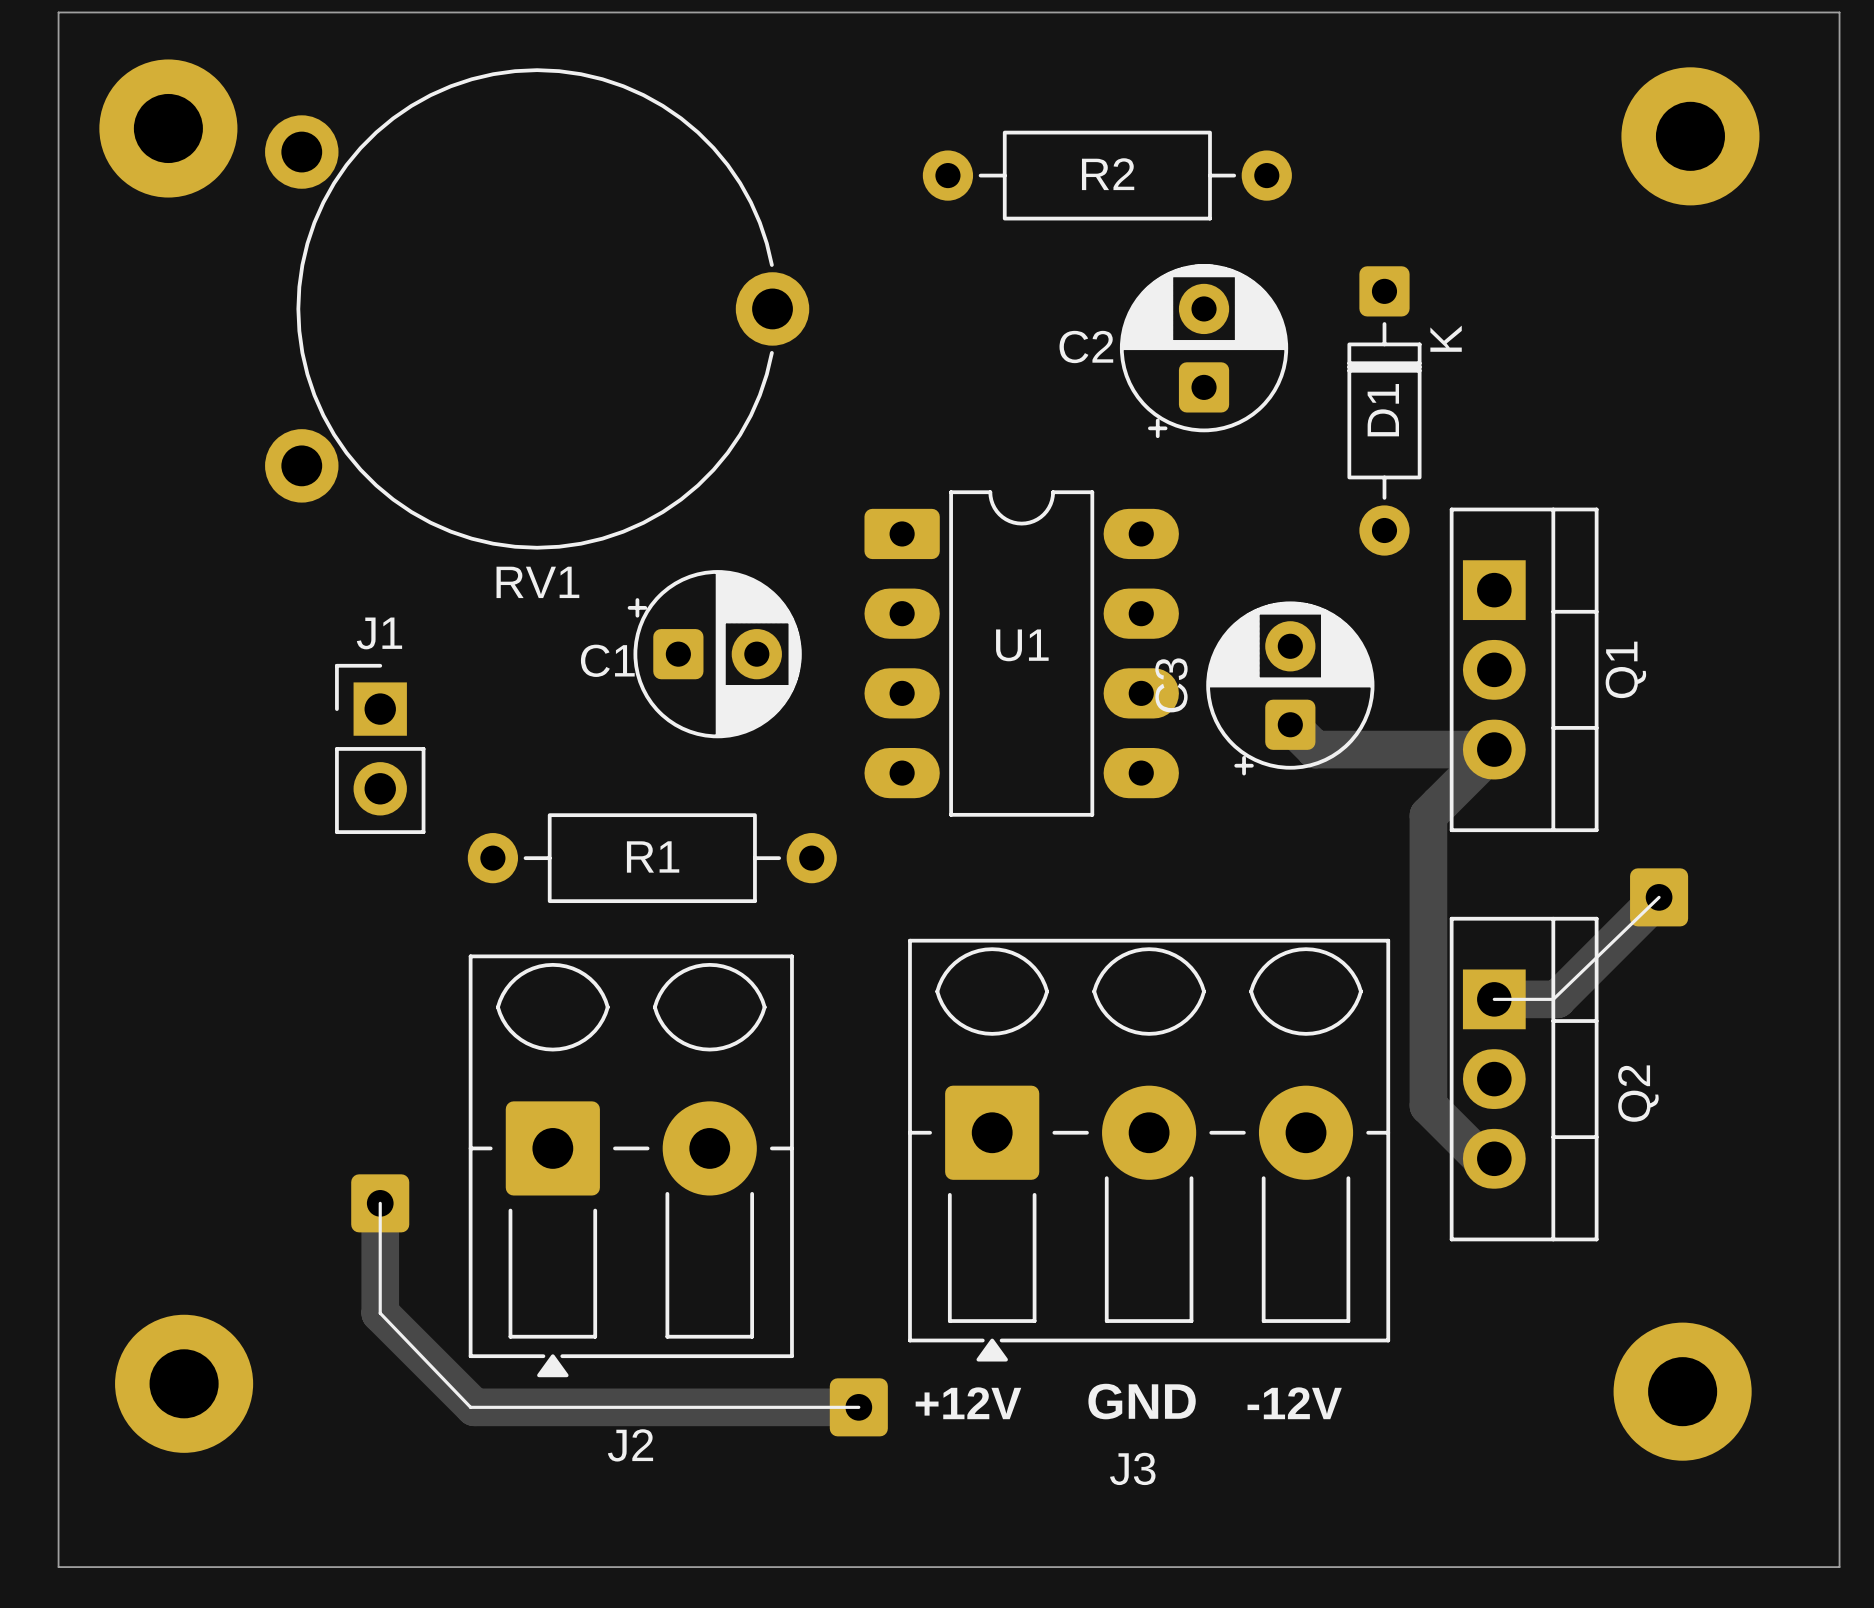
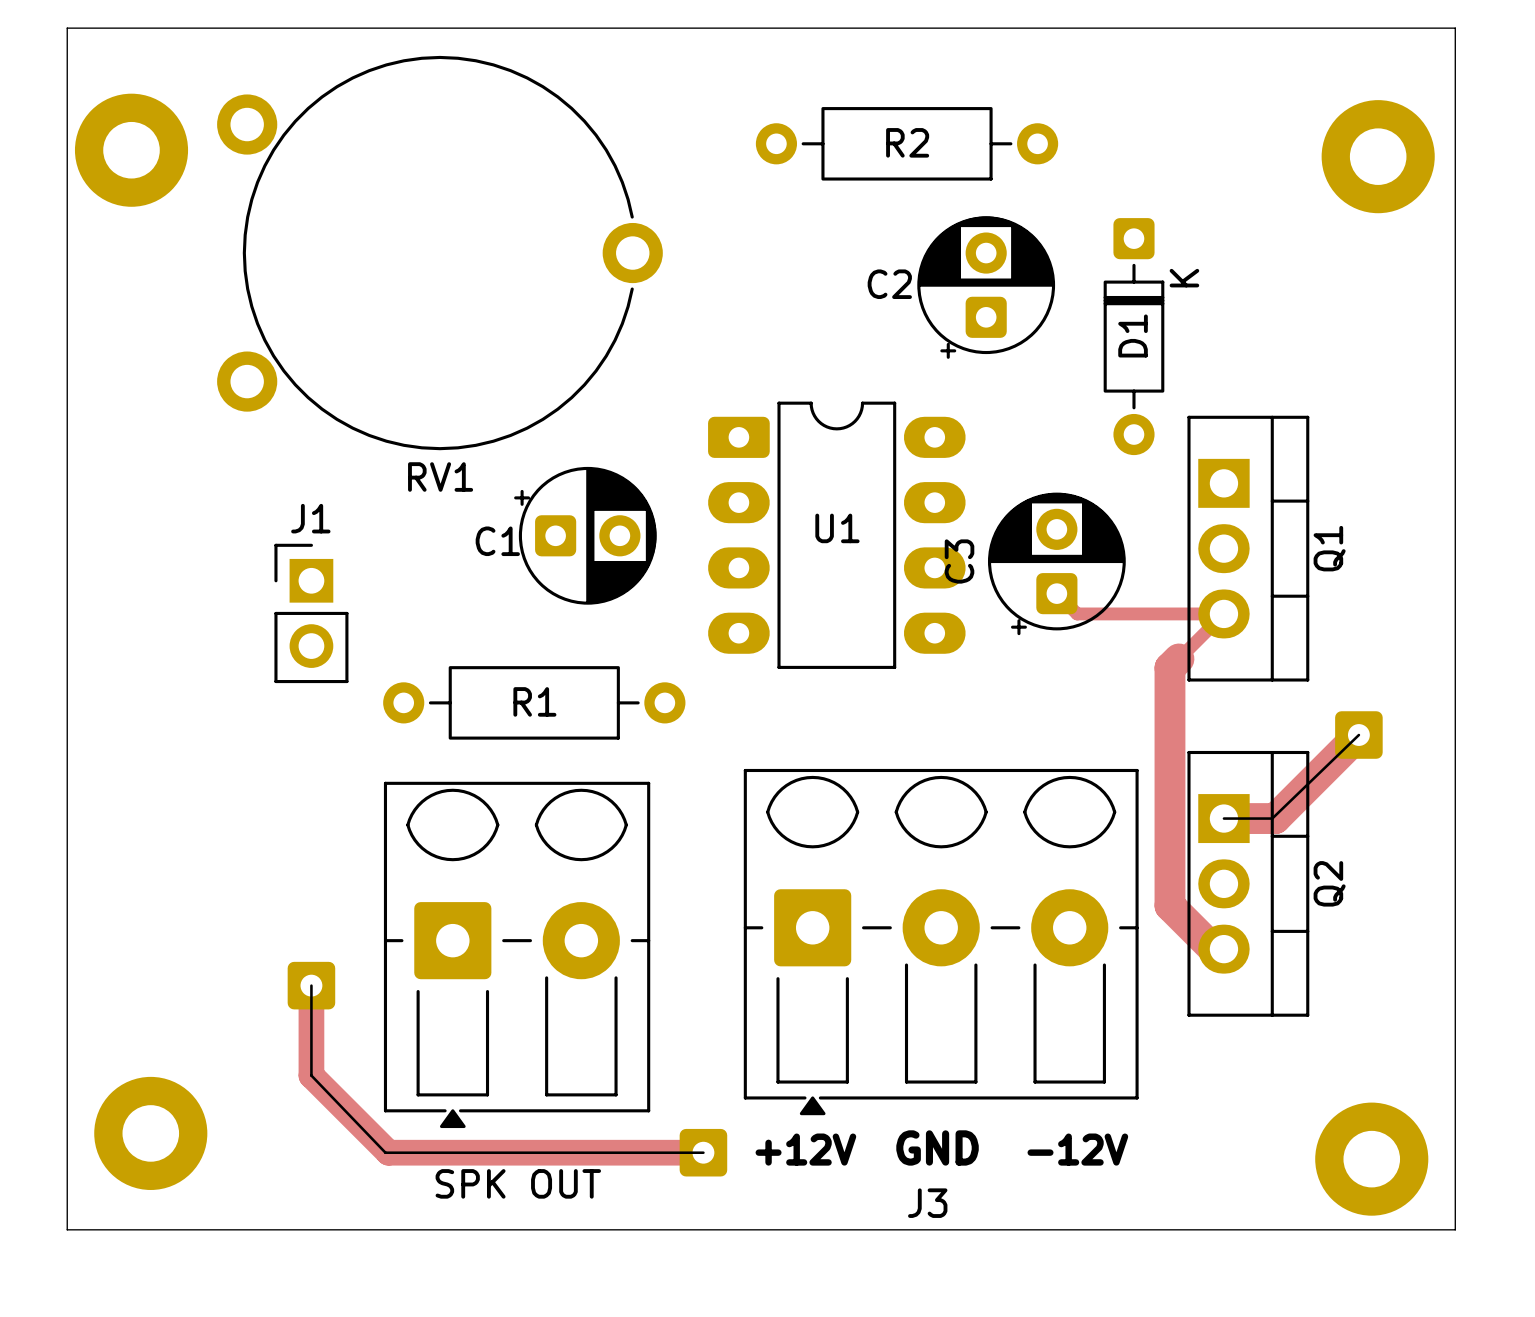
board edge: (58, 12) (1839, 12) (1839, 1567) (58, 1567) (58, 12) -> (67, 28) (67, 1229) (1455, 1229) (1455, 28) (67, 28)
part position: (168, 128) -> (131, 150)
part position: (1690, 136) -> (1378, 156)
track width: thick (1290, 724) (1315, 749) (1494, 749) (1439, 804) -> thin (1056, 593) (1077, 613) (1223, 613) (1178, 658)
Q2 name position: Q2 (1638, 1093) -> Q2 (1329, 883)
track width: thick (380, 1203) (380, 1313) (474, 1407) (858, 1407) -> thin (311, 985) (311, 1075) (388, 1152) (703, 1152)
part position: (1682, 1391) -> (1371, 1159)
J2 name: J2 (630, 1445) -> SPK OUT (518, 1183)

